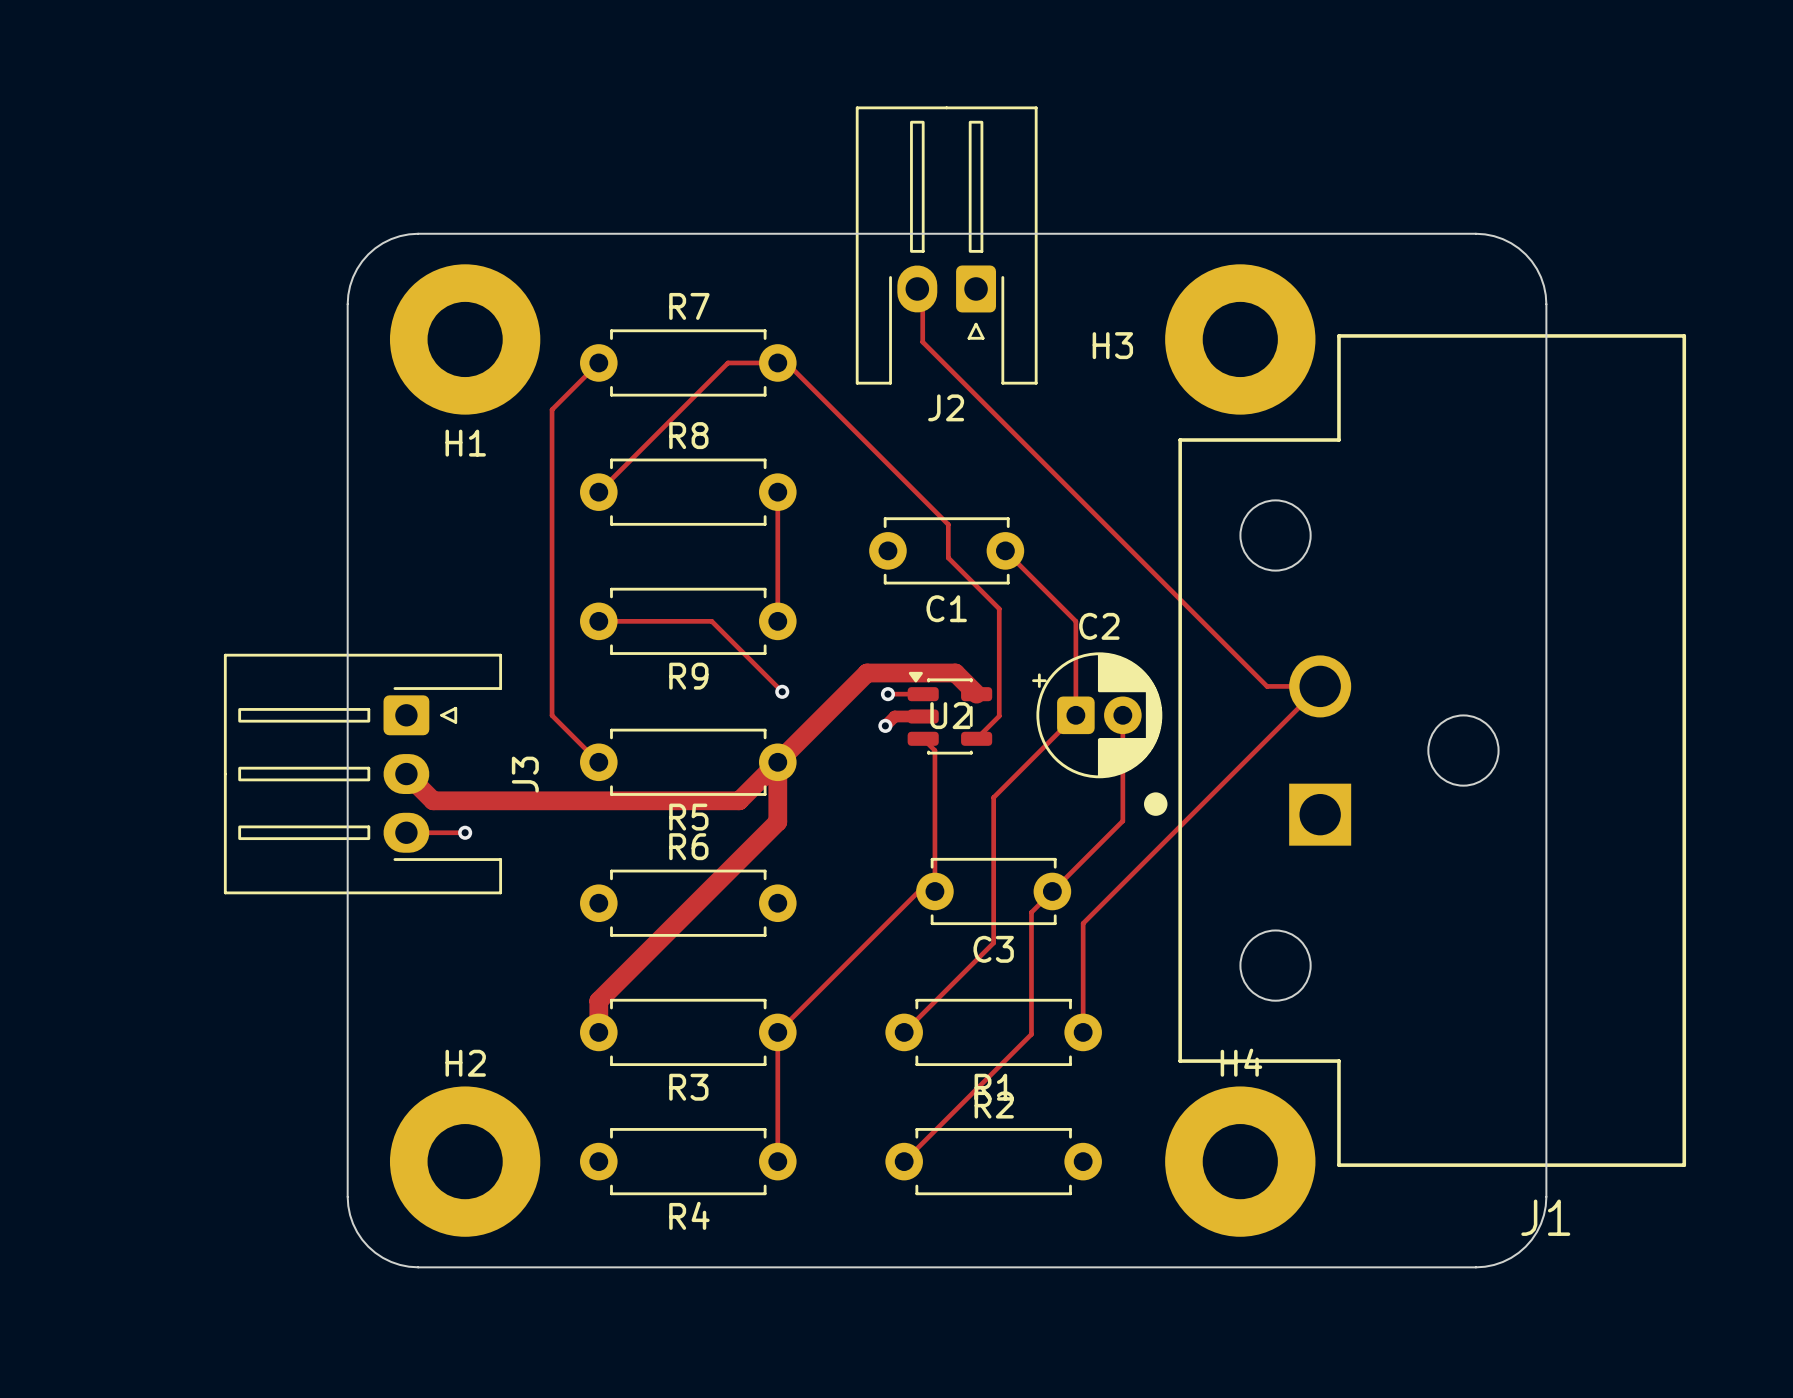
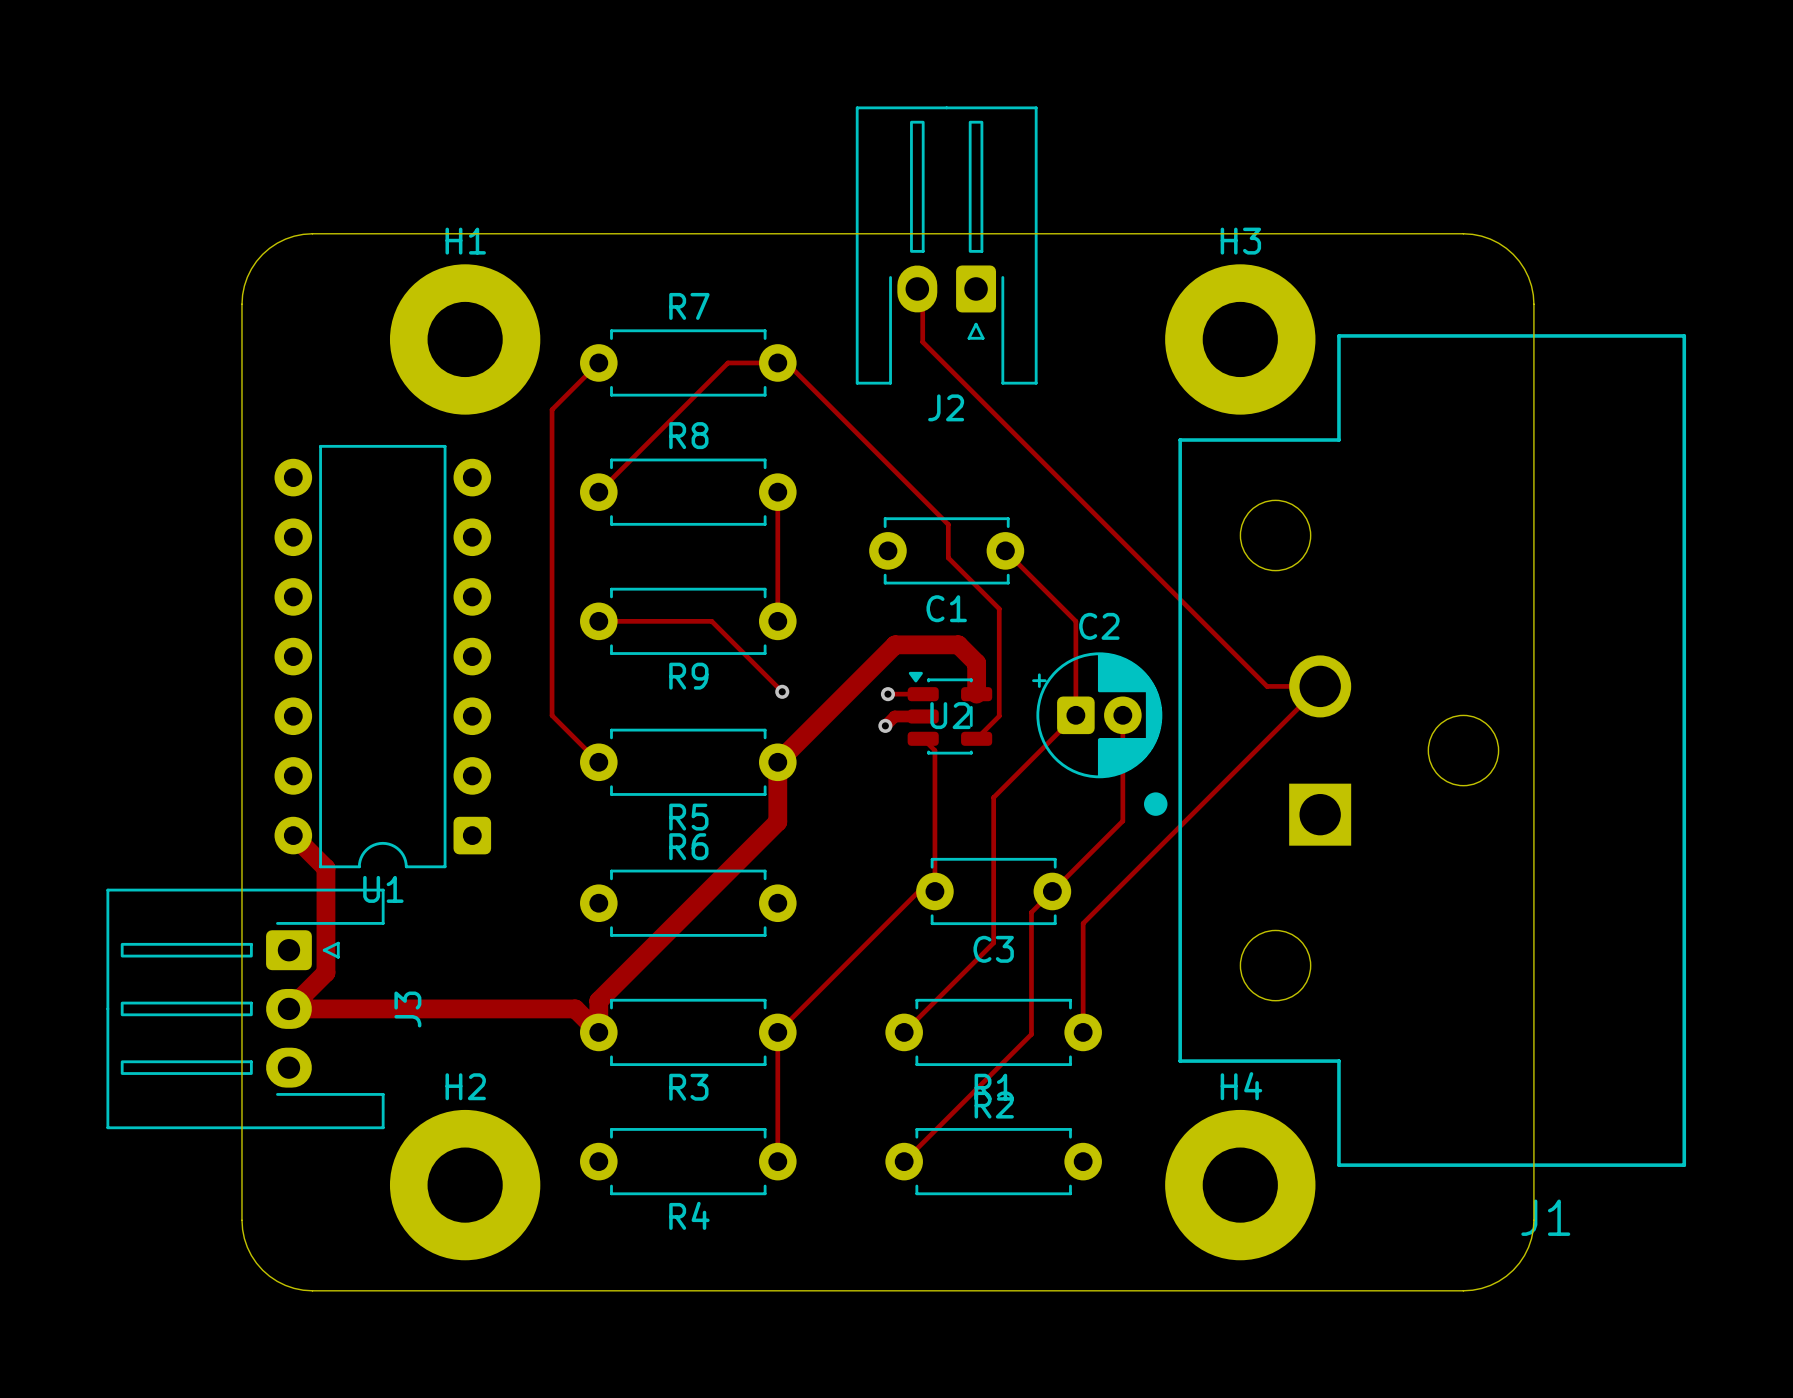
board edge: (418, 233) (391, 239) (368, 254) (353, 277) (347, 304) (347, 1196) (353, 1223) (368, 1246) (391, 1261) (418, 1267) (1475, 1267) (1494, 1264) (1518, 1252) (1536, 1232) (1545, 1206) (1546, 304) (1541, 277) (1531, 261) (1518, 248) (1494, 236) (1463, 233) -> (418, 233) (312, 233) (285, 239) (269, 248) (256, 261) (247, 277) (242, 295) (241, 1220) (244, 1238) (256, 1263) (277, 1281) (303, 1290) (1463, 1290) (1490, 1285) (1513, 1270) (1528, 1247) (1533, 1220) (1533, 304) (1528, 277) (1513, 254) (1490, 239) (1463, 233)
H3 name position: H3 (1112, 345) -> H3 (1240, 241)
H1 name position: H1 (465, 443) -> H1 (465, 241)
U1: none -> (382, 656)
track: (867, 673) (955, 673) (976, 694) -> (867, 673) (895, 644) (958, 644) (976, 663) (976, 694)
track: (777, 762) (739, 800) (433, 800) (406, 774) -> none
J3 position: (362, 774) -> (245, 1008)
track: (406, 832) (465, 832) -> none
via: (465, 832) -> none
track: none -> (293, 835) (325, 868) (325, 972) (289, 1008)
track: none -> (288, 1008) (575, 1008) (598, 1032)
H2 position: (465, 1161) -> (465, 1185)
H4 position: (1240, 1161) -> (1240, 1185)

